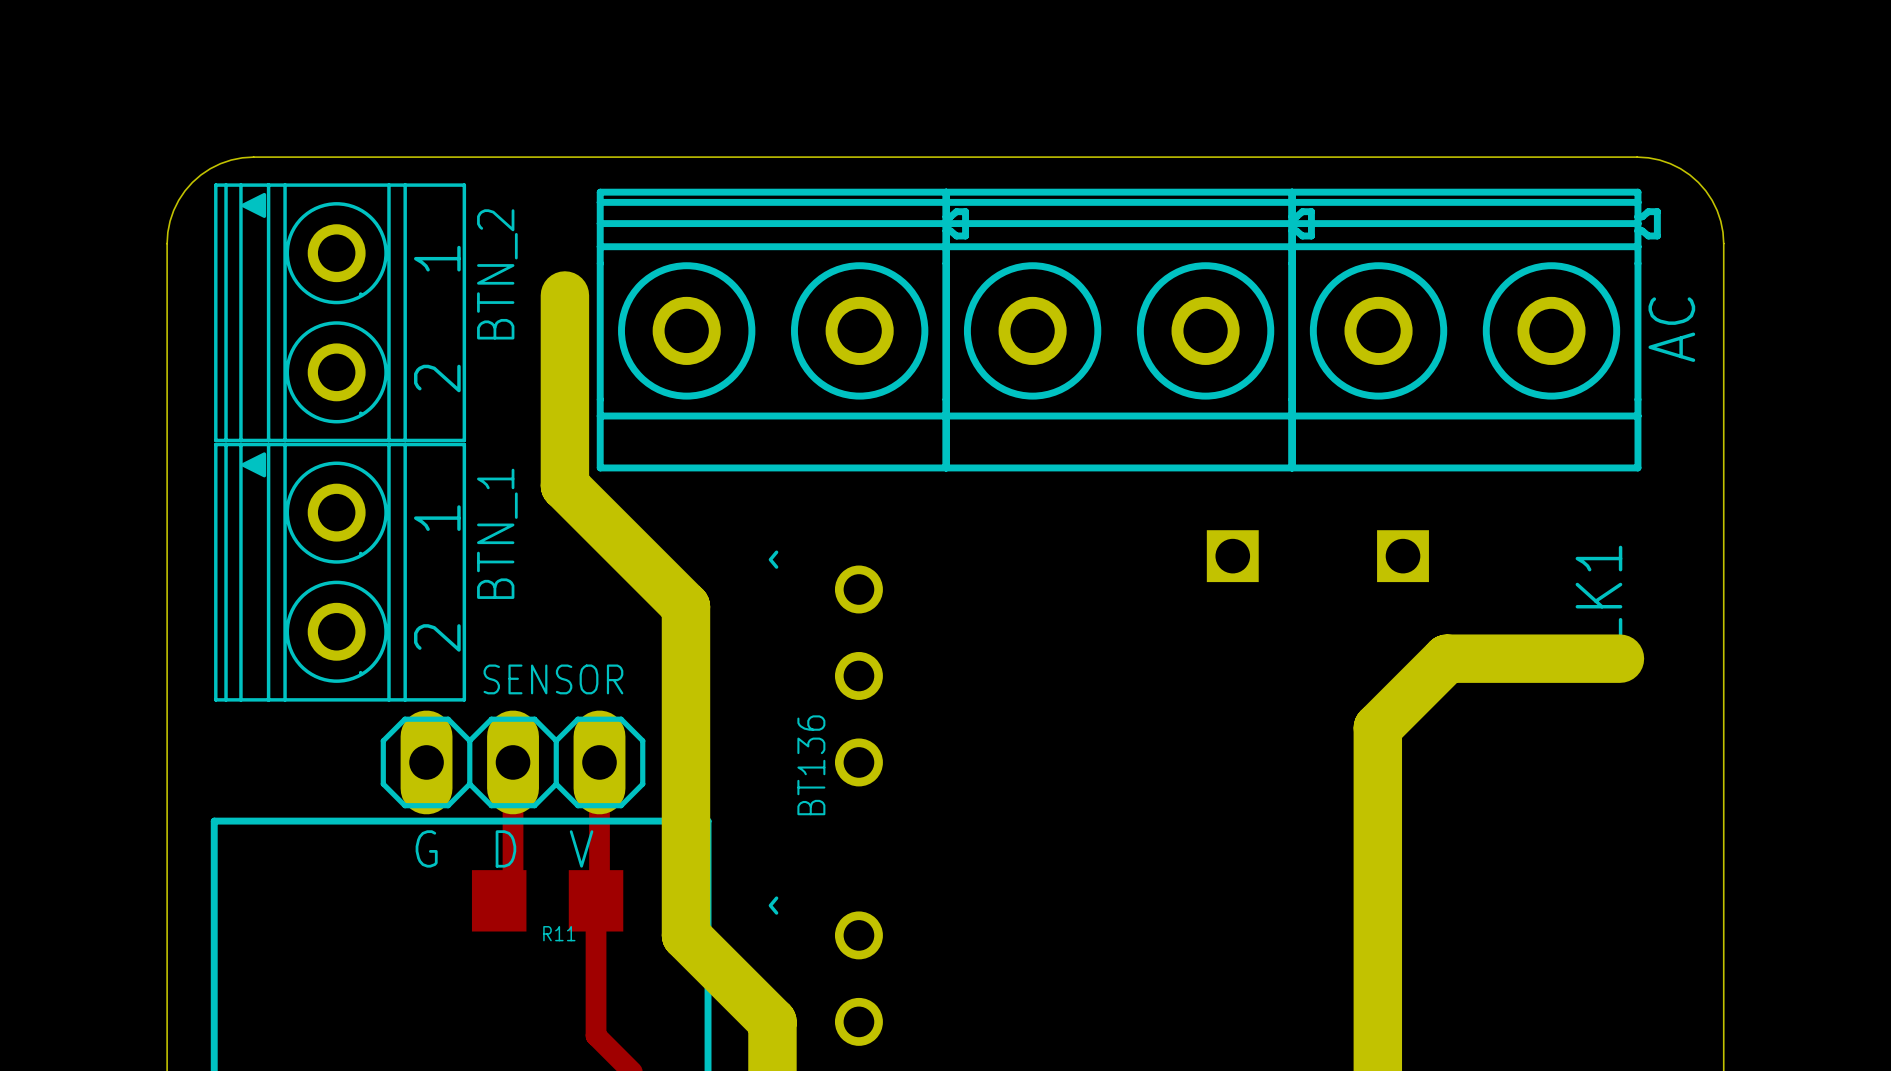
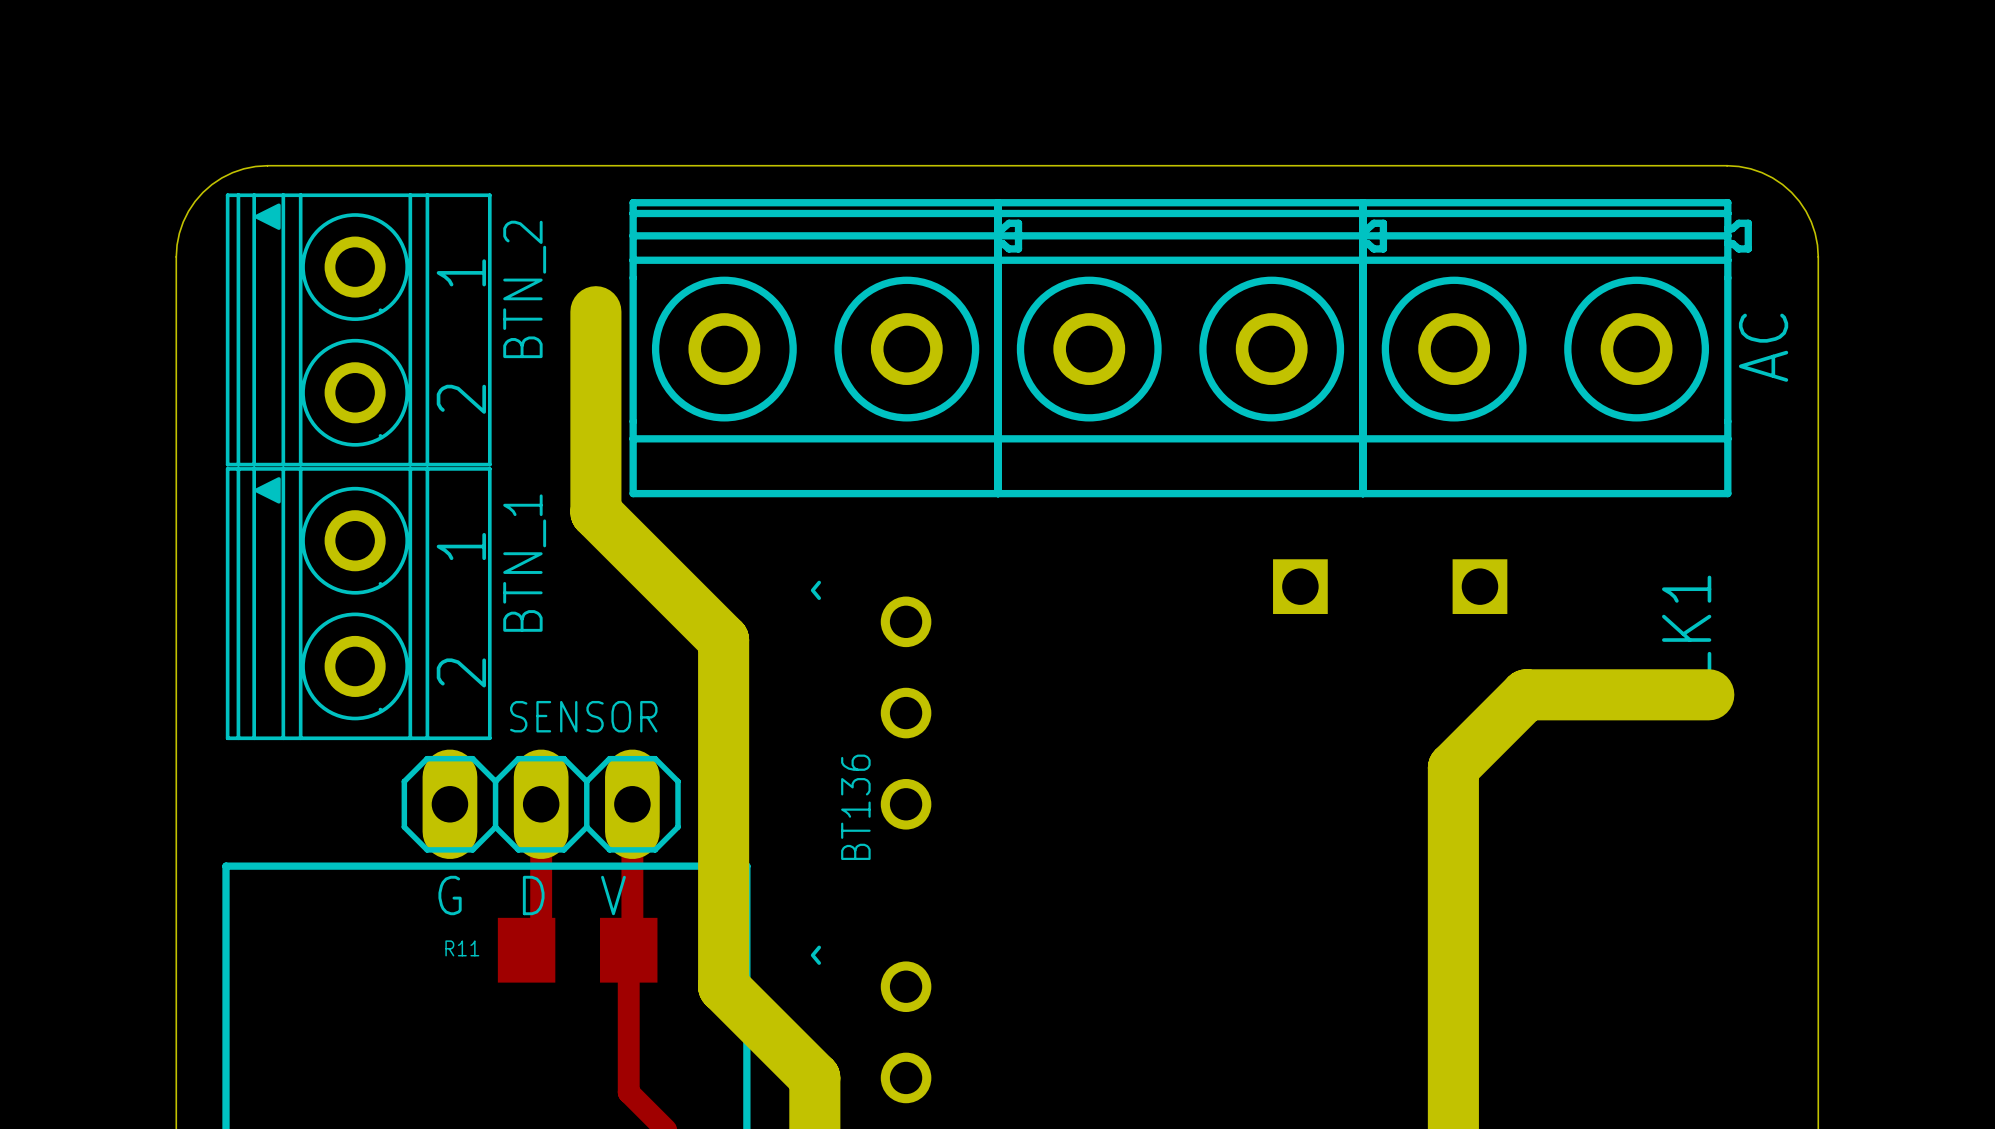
R11 name position: R11 (559, 933) -> R11 (462, 948)

